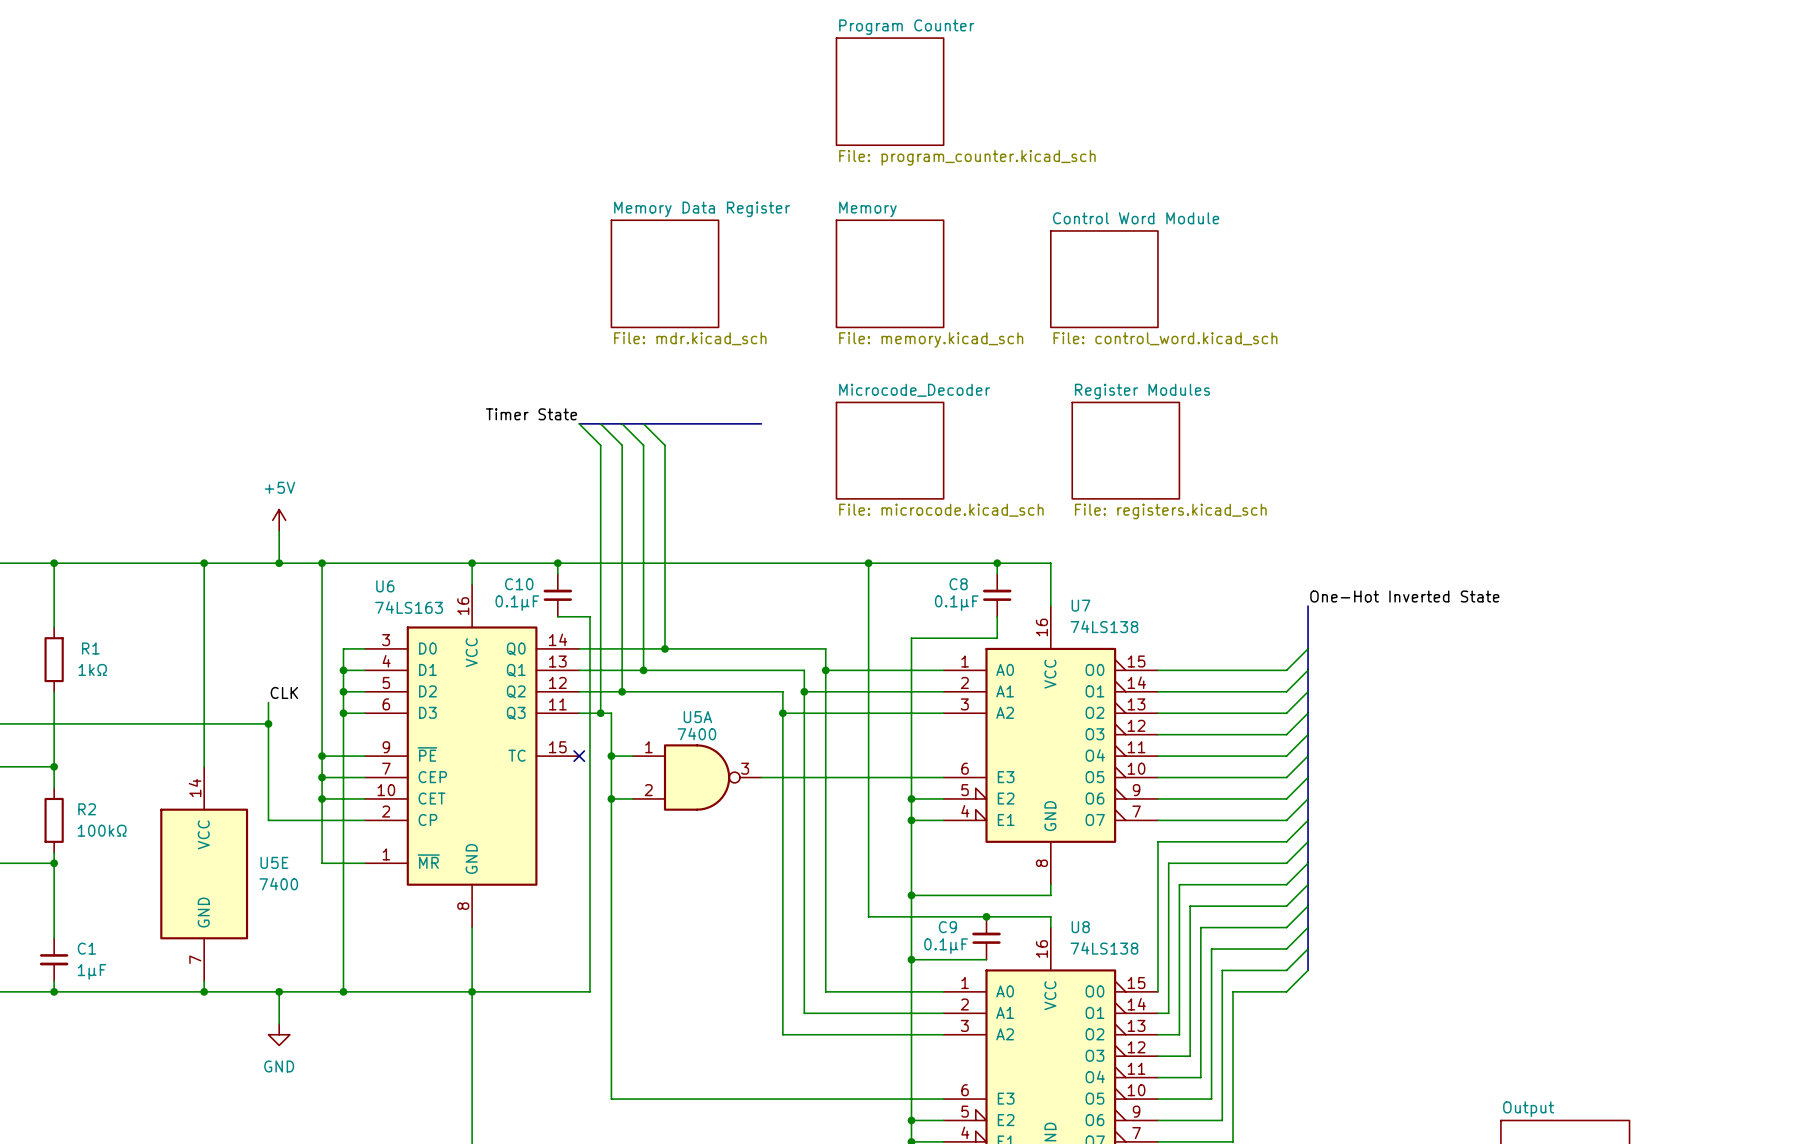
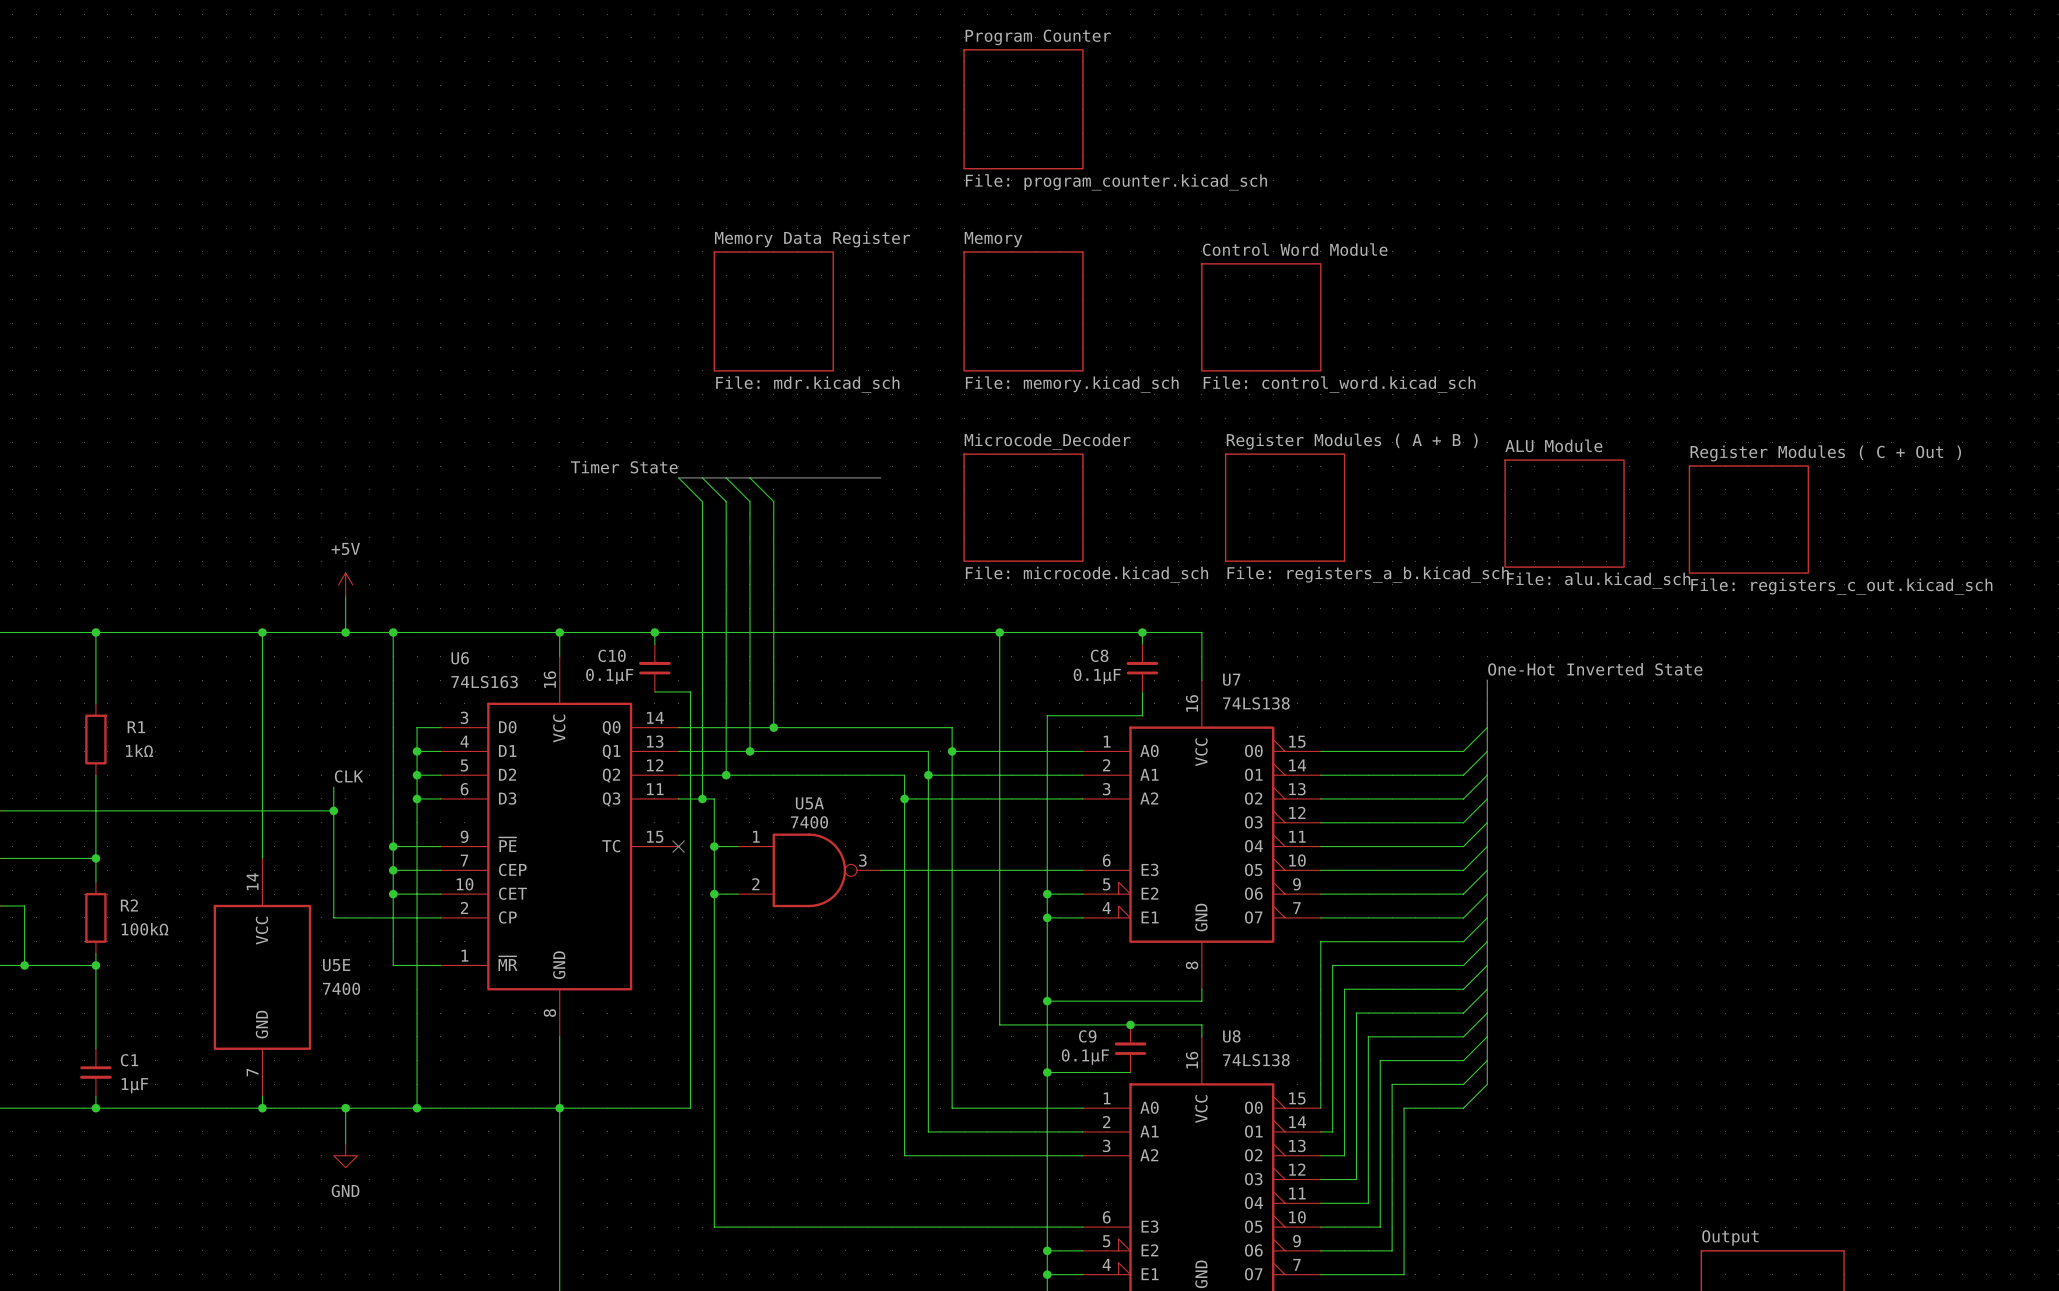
sheet Register Modules name: Register Modules (1142, 391) -> Register Modules ( A + B ) (1352, 441)
sheet ALU Module: none -> File: alu.kicad_sch (1564, 513)
sheet Register Modules ( C + Out ): none -> File: registers_c_out.kicad_sch (1748, 519)
sheet Register Modules value: File: registers.kicad_sch (1170, 511) -> File: registers_a_b.kicad_sch (1368, 574)

